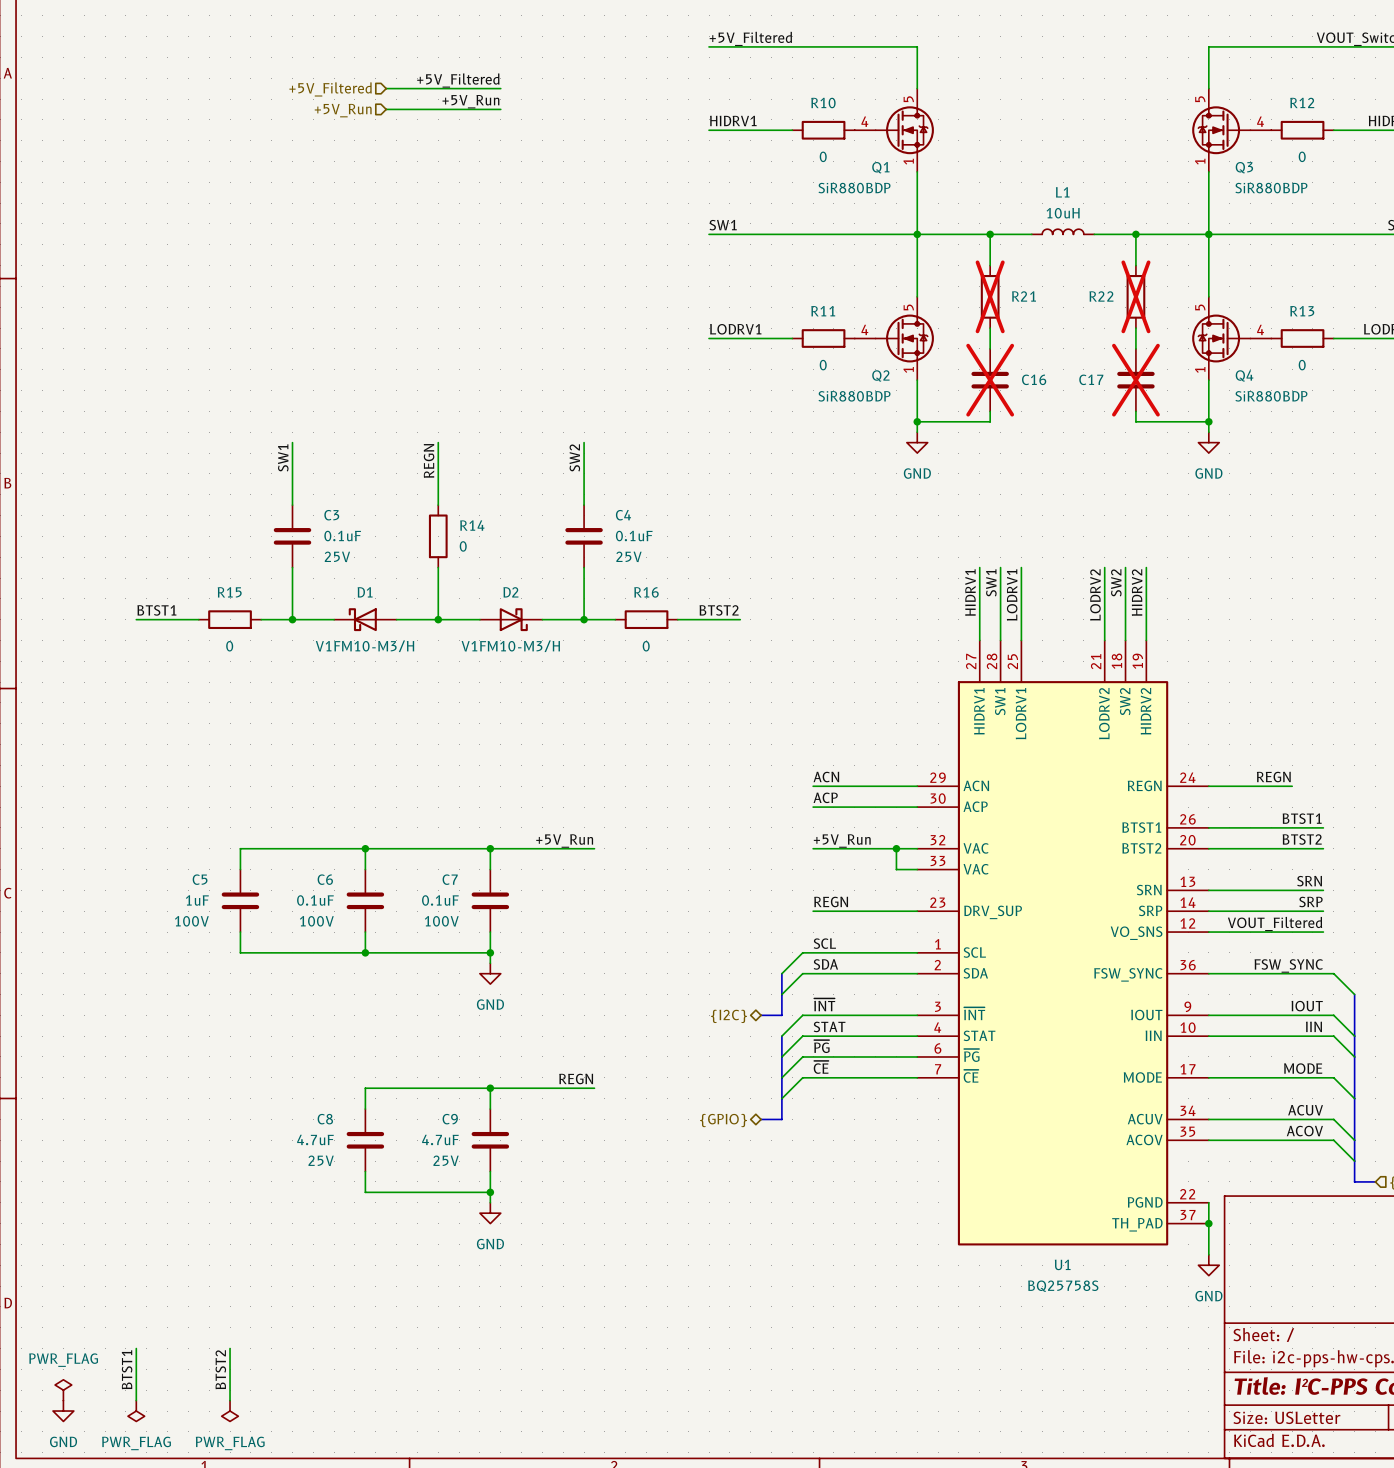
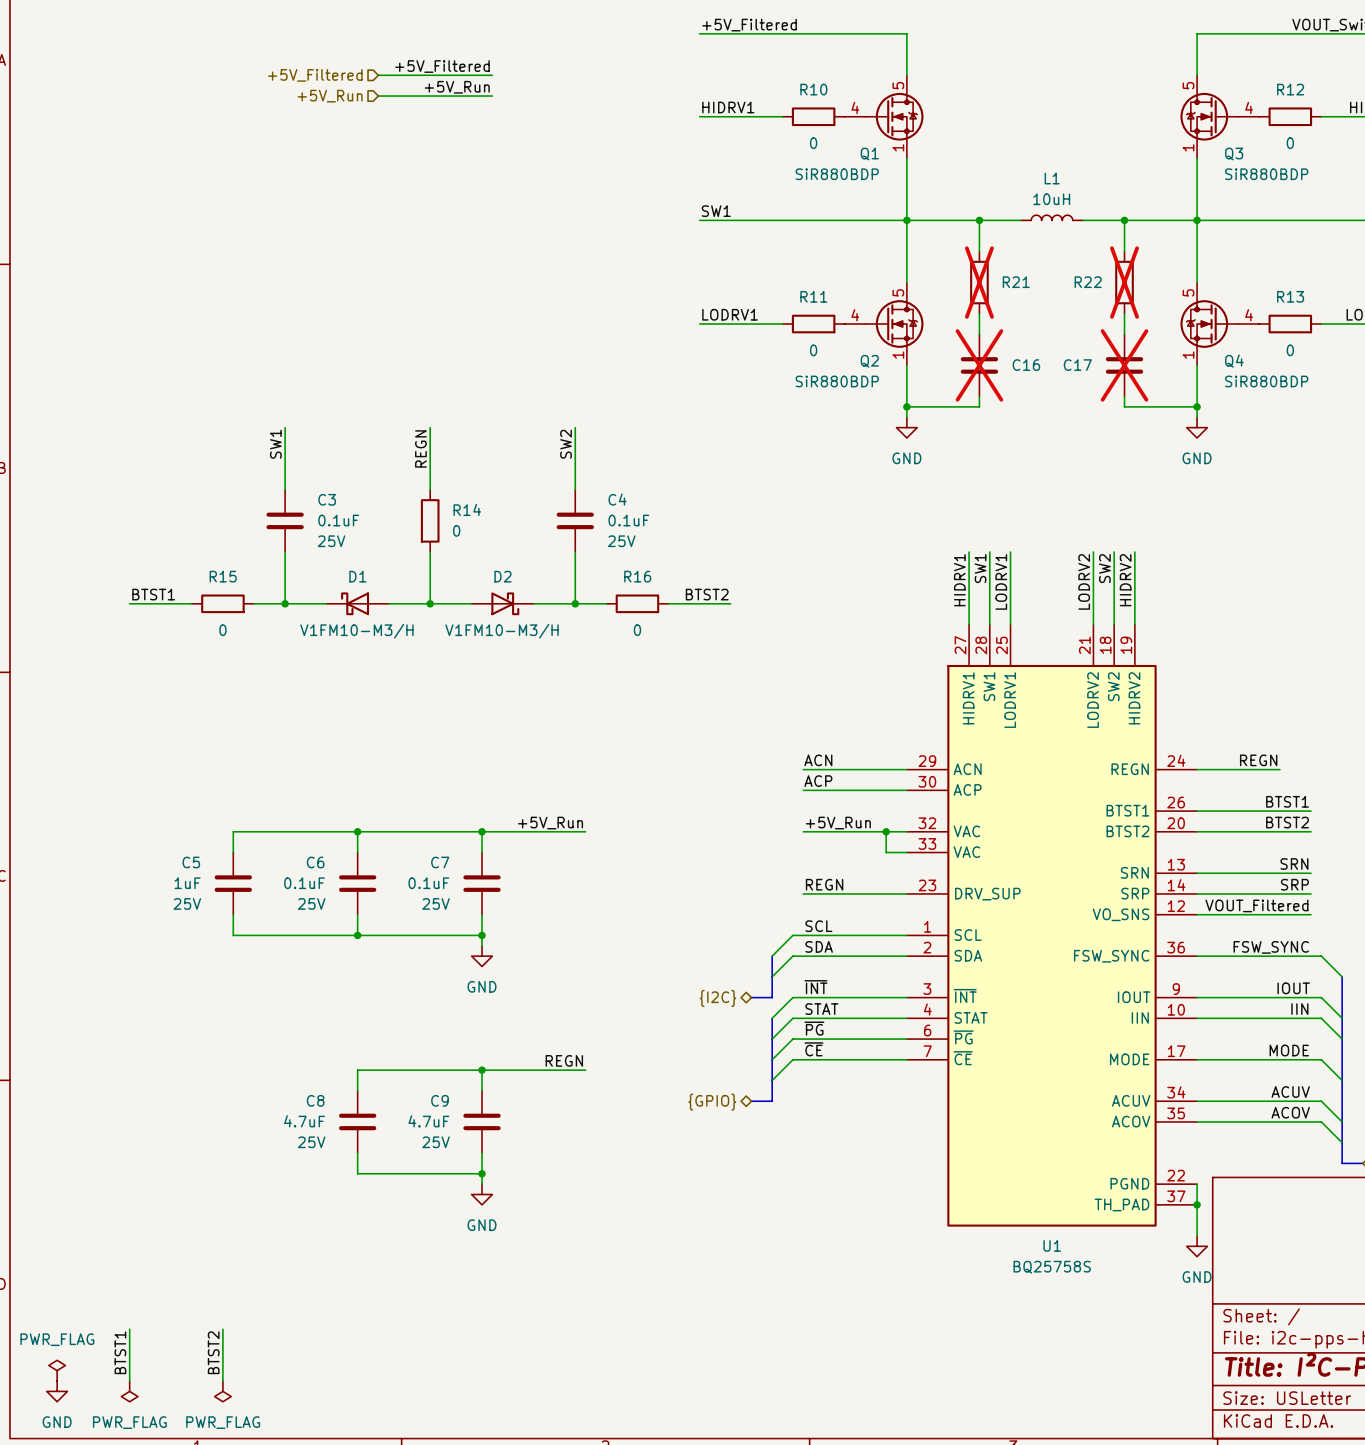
C5 text: 100V (191, 921) -> 25V (187, 903)
C6 text: 100V (316, 921) -> 25V (311, 903)
C7 text: 100V (441, 921) -> 25V (436, 903)

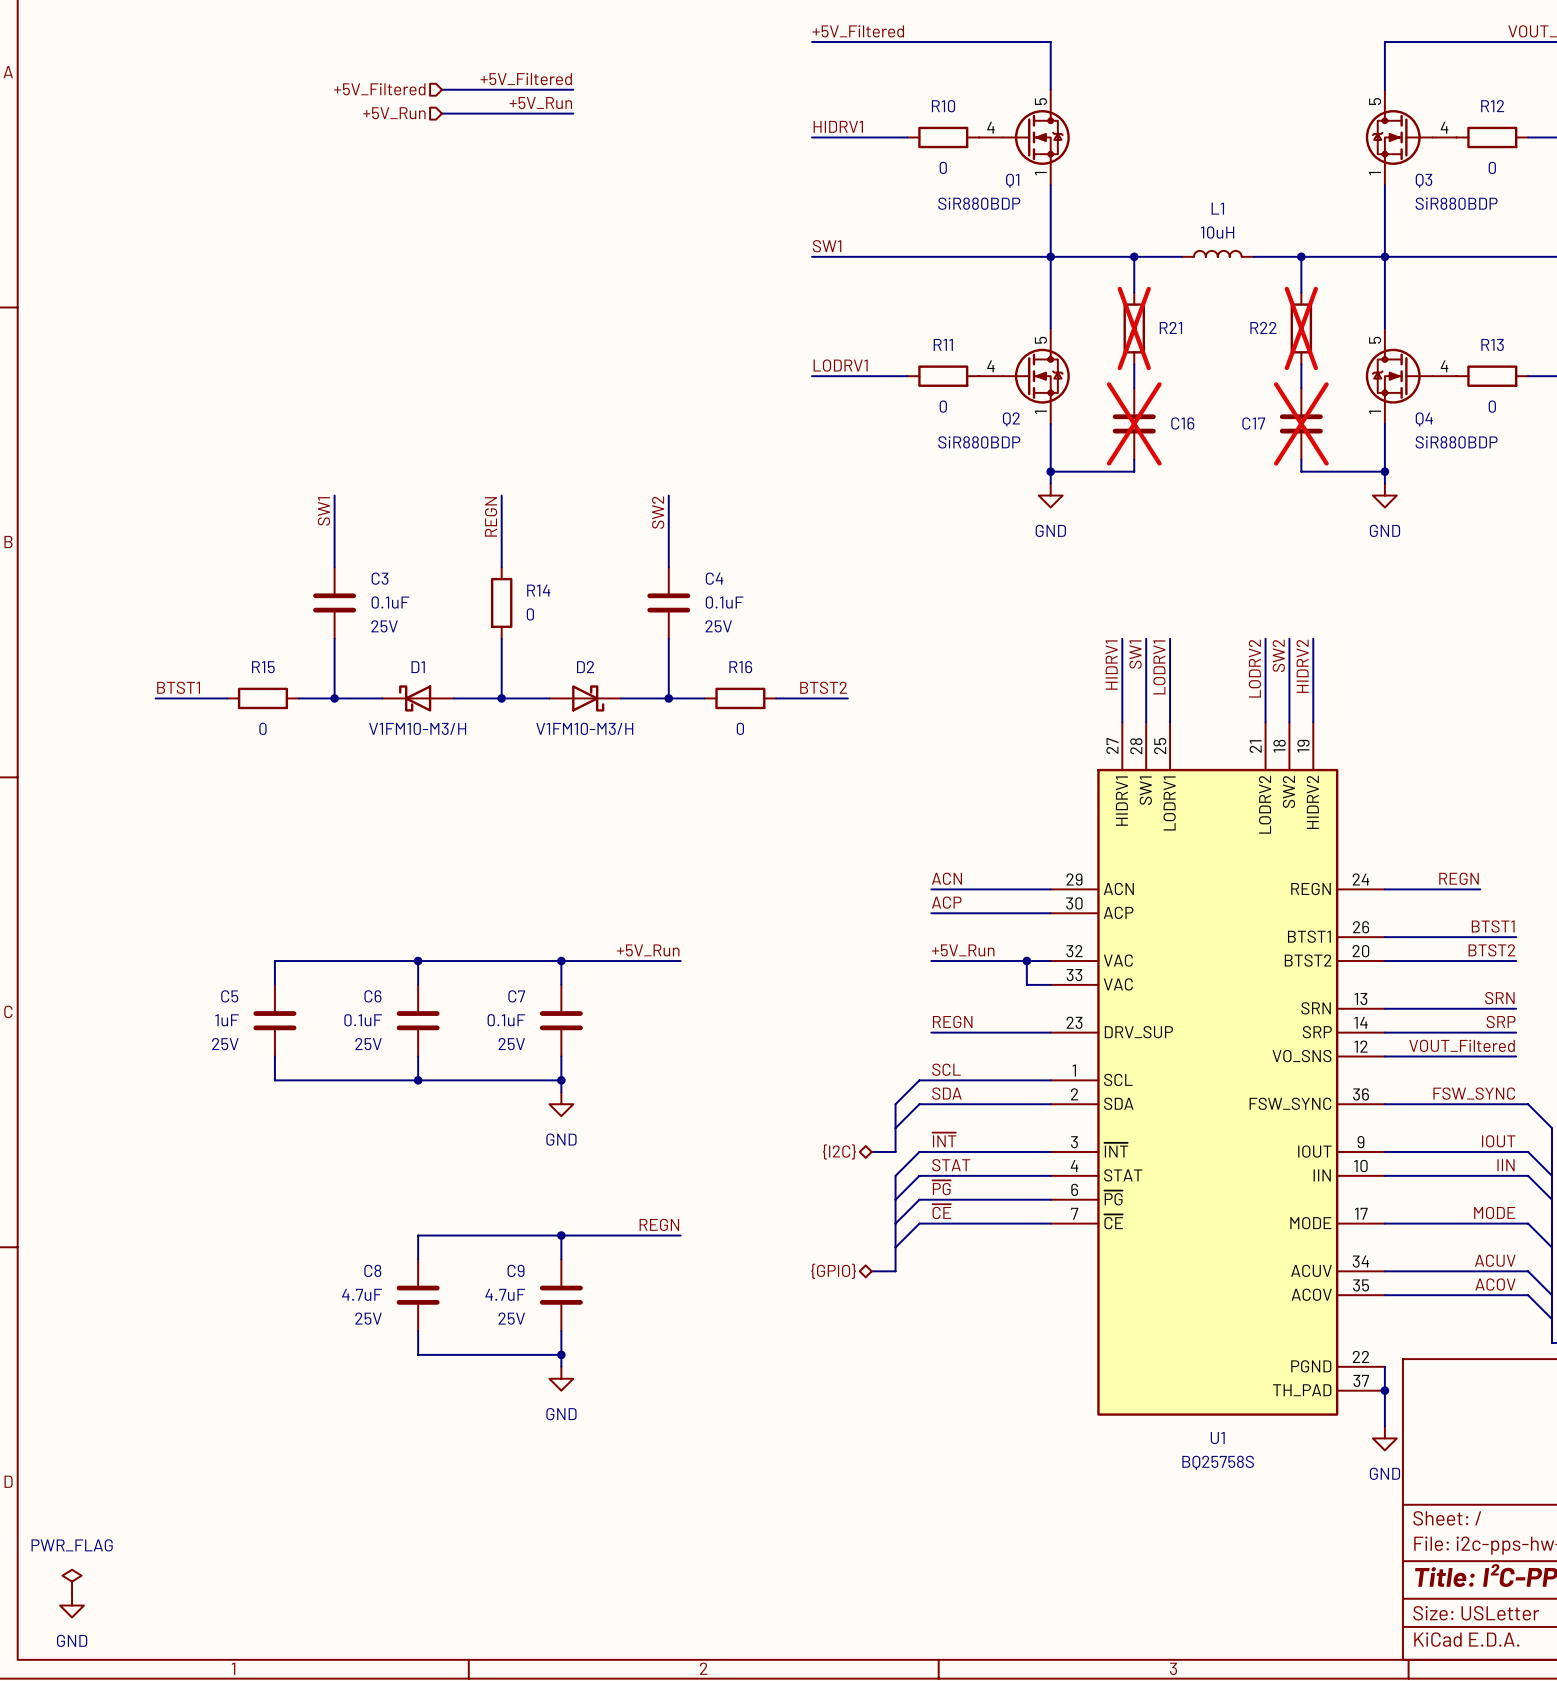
wire: (129, 1329) (129, 1381) -> none
wire: (222, 1329) (222, 1381) -> none
label: BTST1 (120, 1352) -> none
label: BTST2 (213, 1352) -> none
power symbol: PWR_FLAG (129, 1391) -> none
power symbol: PWR_FLAG (222, 1391) -> none

